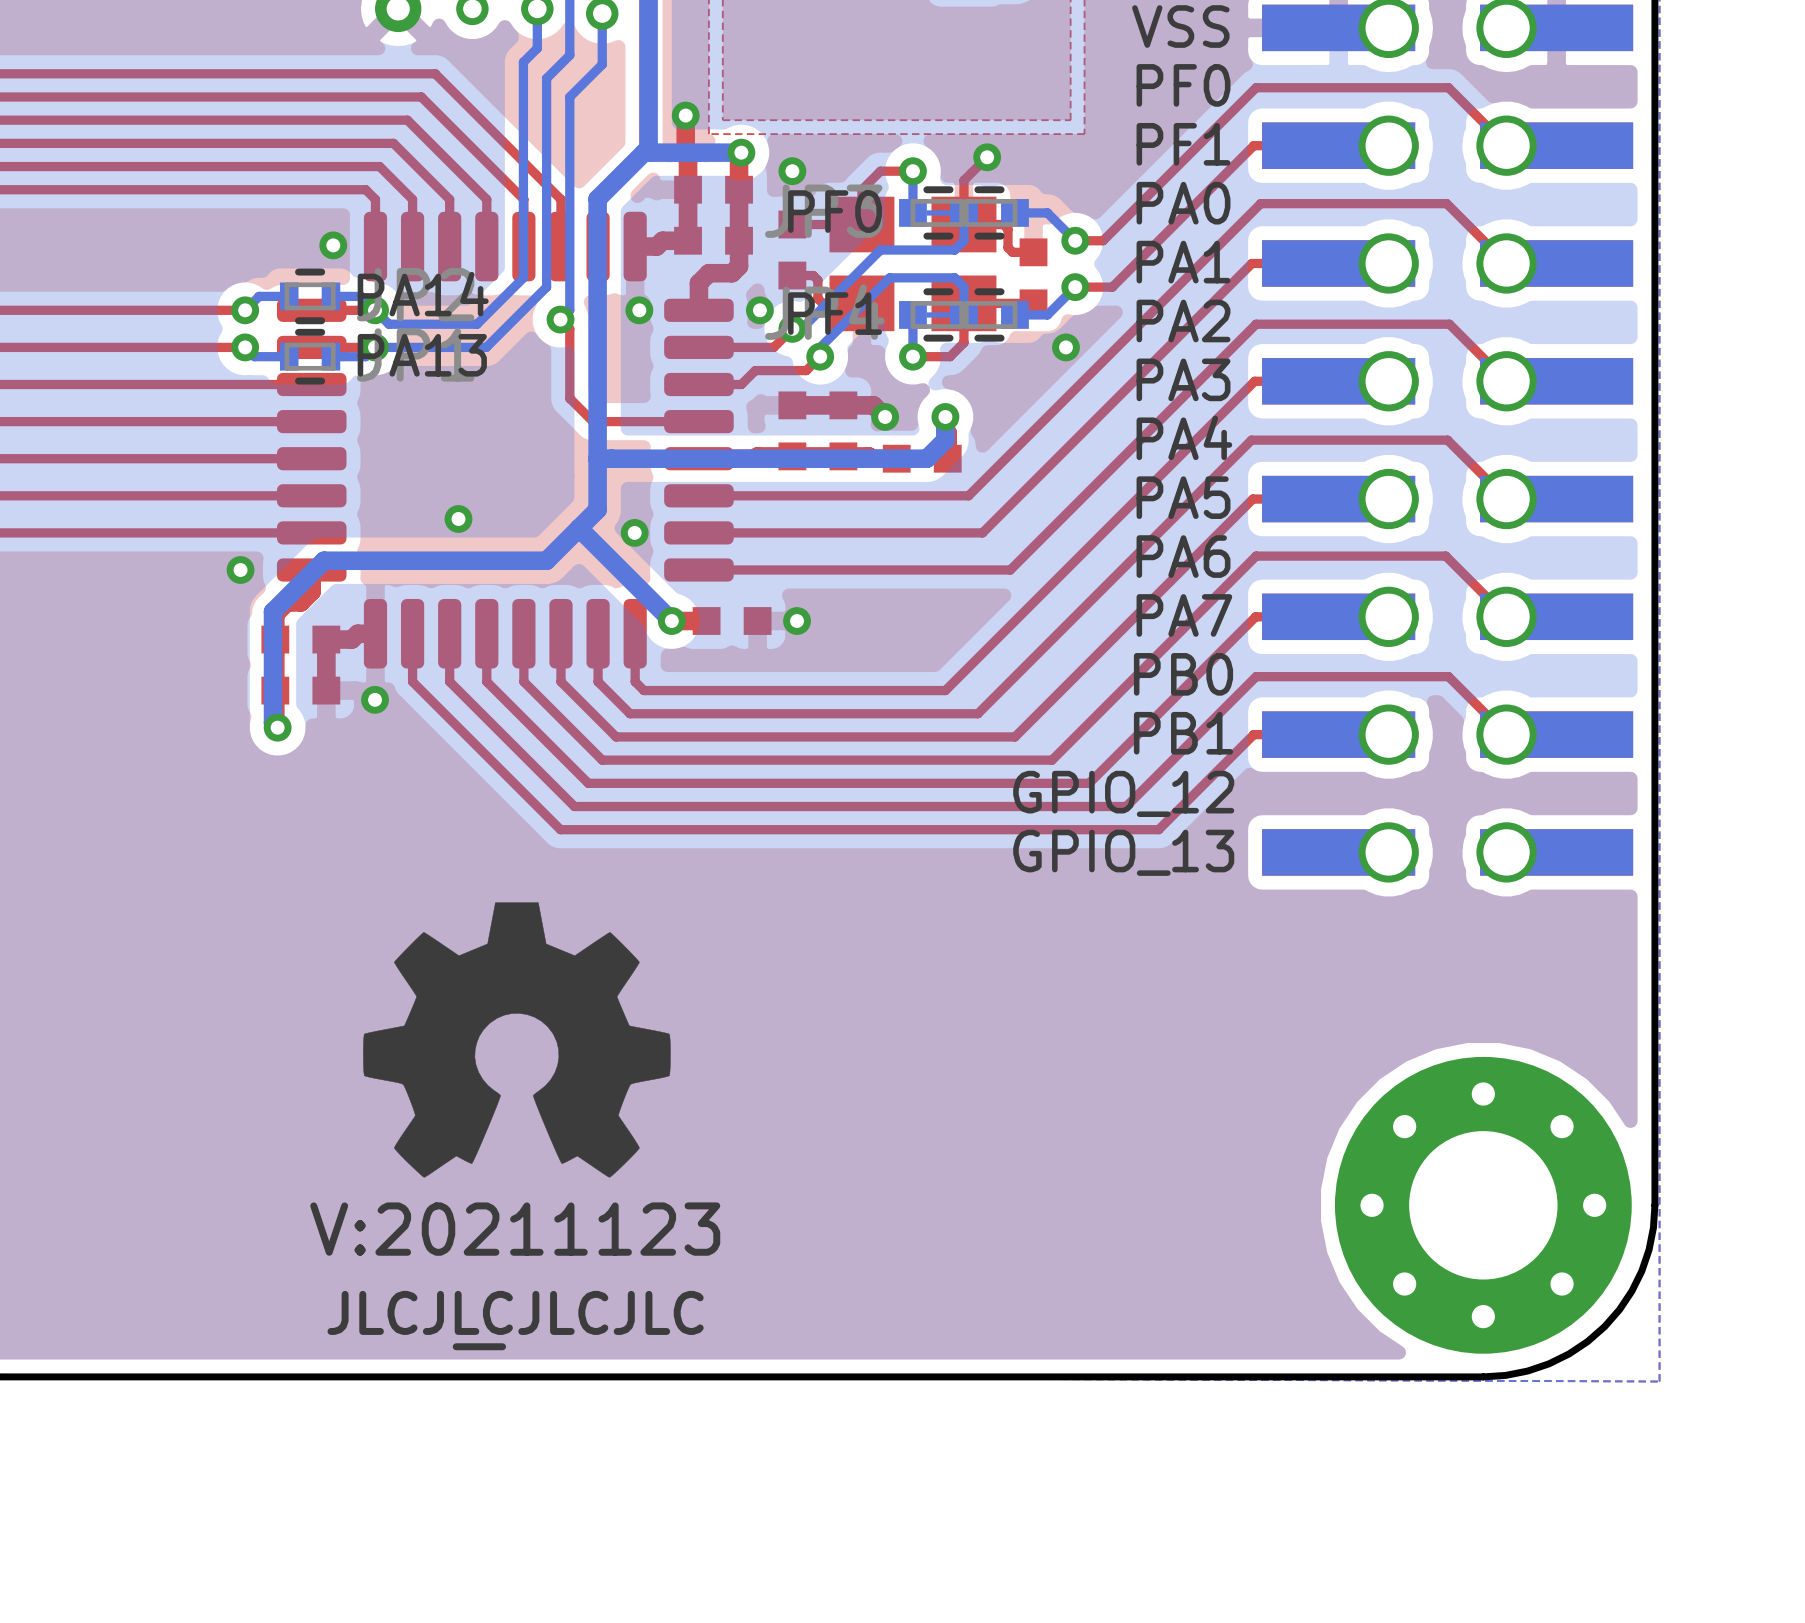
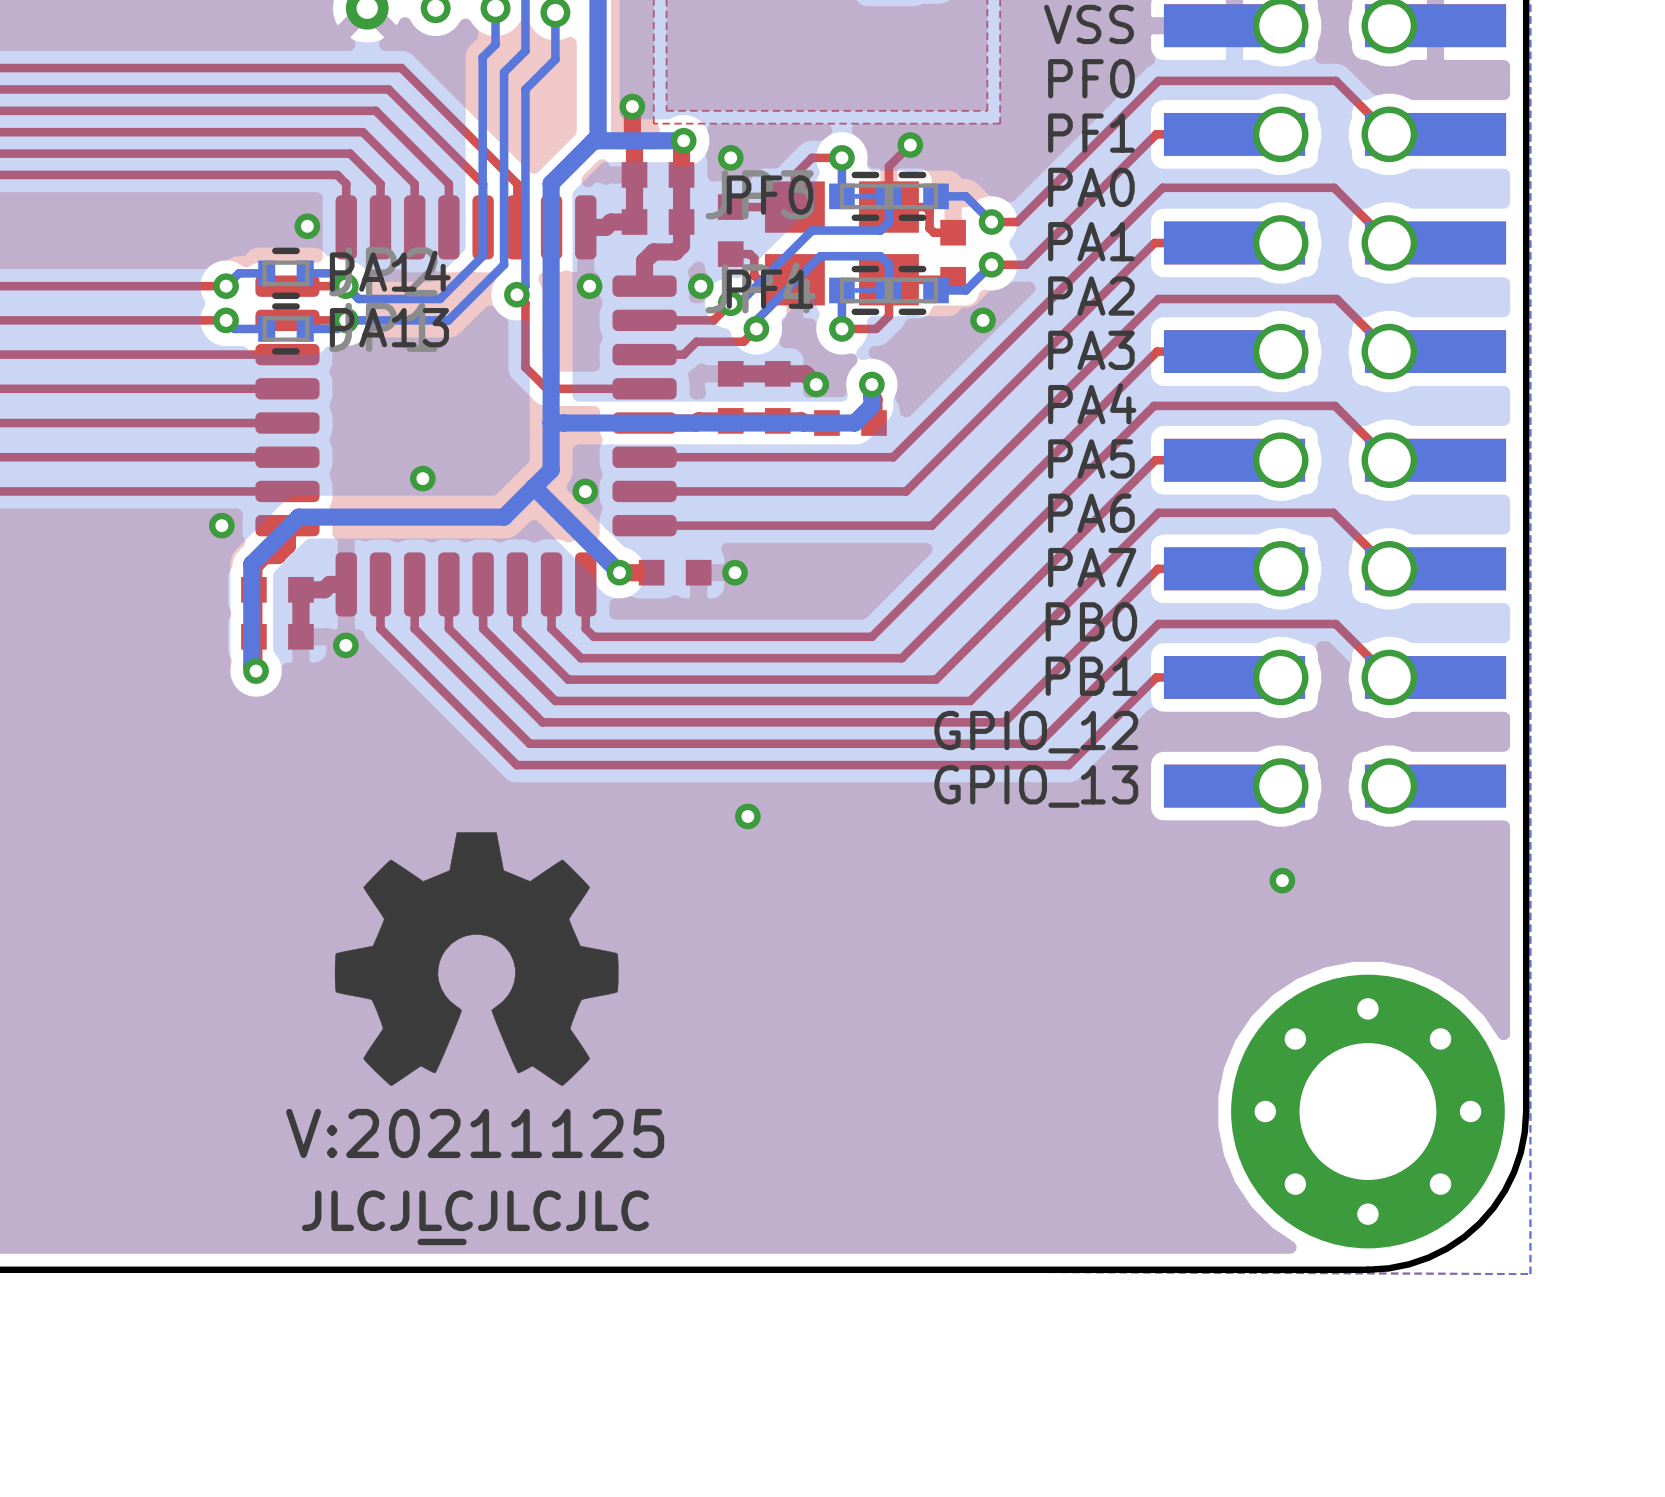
via: none -> (747, 816)
via: none -> (1282, 880)
drawing shape: [310, 1202, 721, 1256] -> [286, 1108, 665, 1159]

